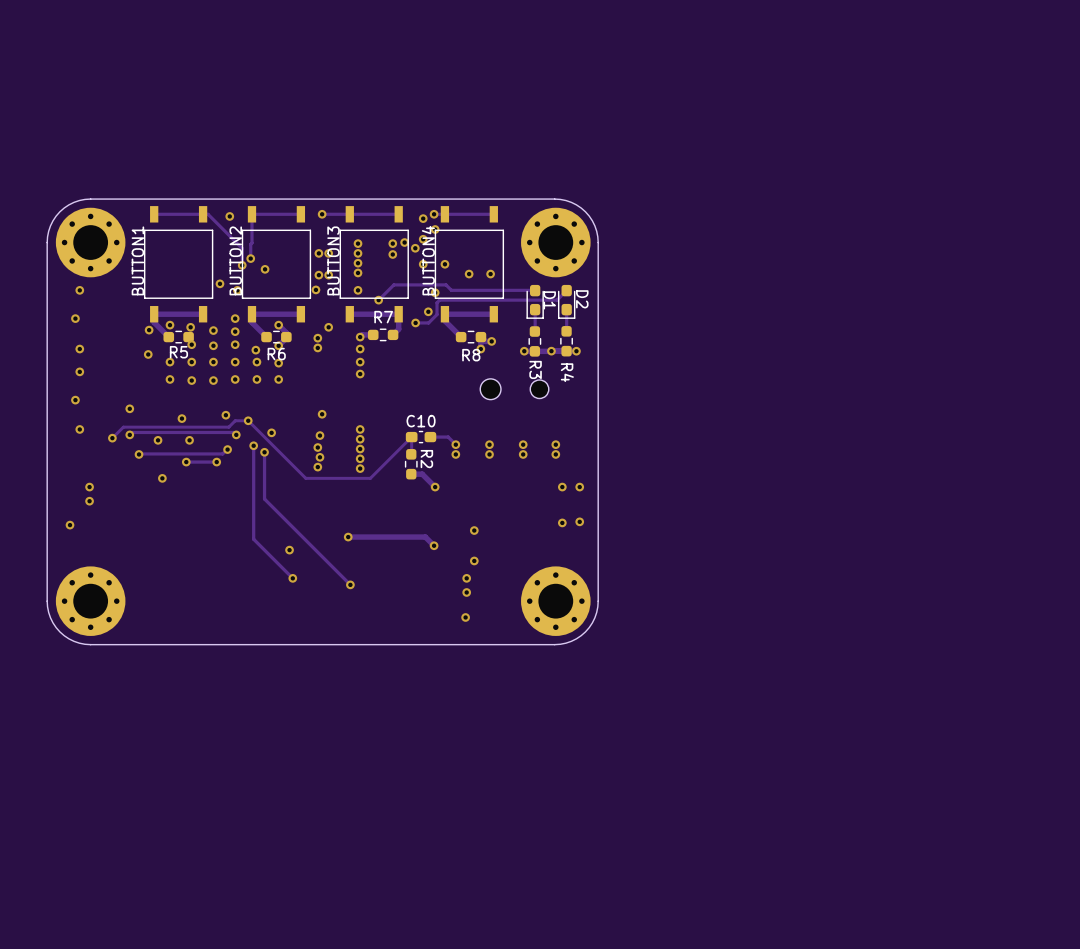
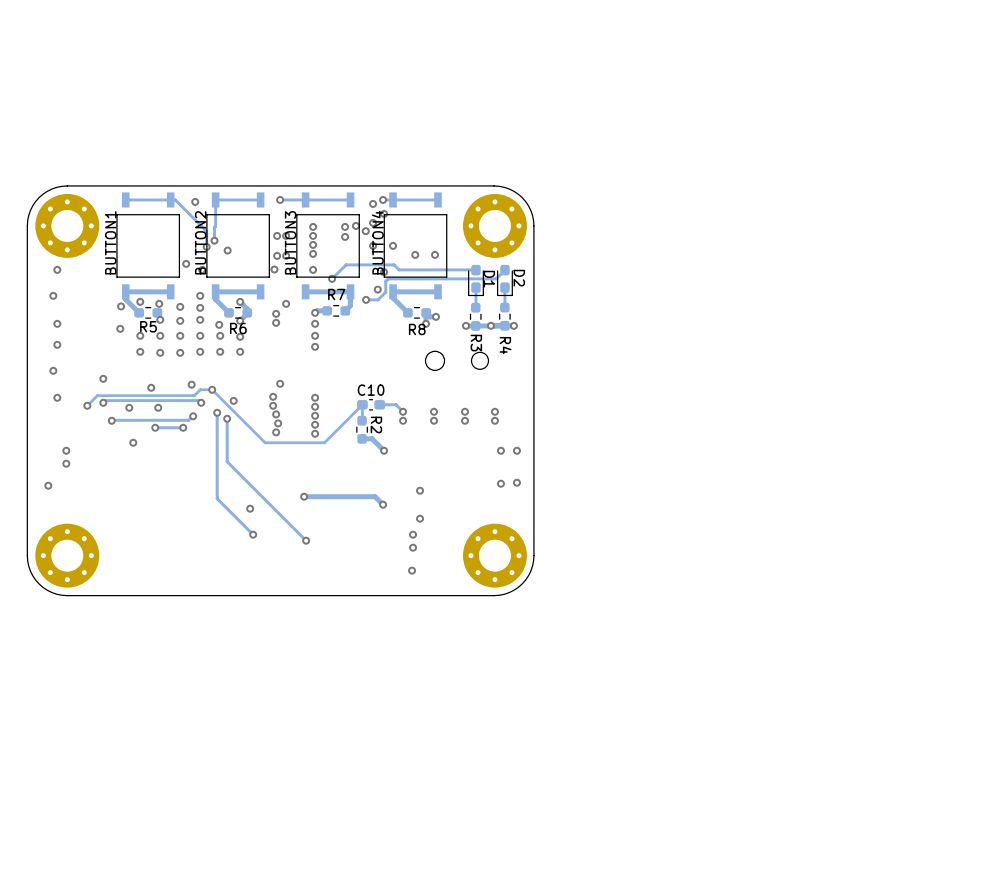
via: none -> (273, 396)
via: (319, 435) -> none
via: none -> (273, 405)

